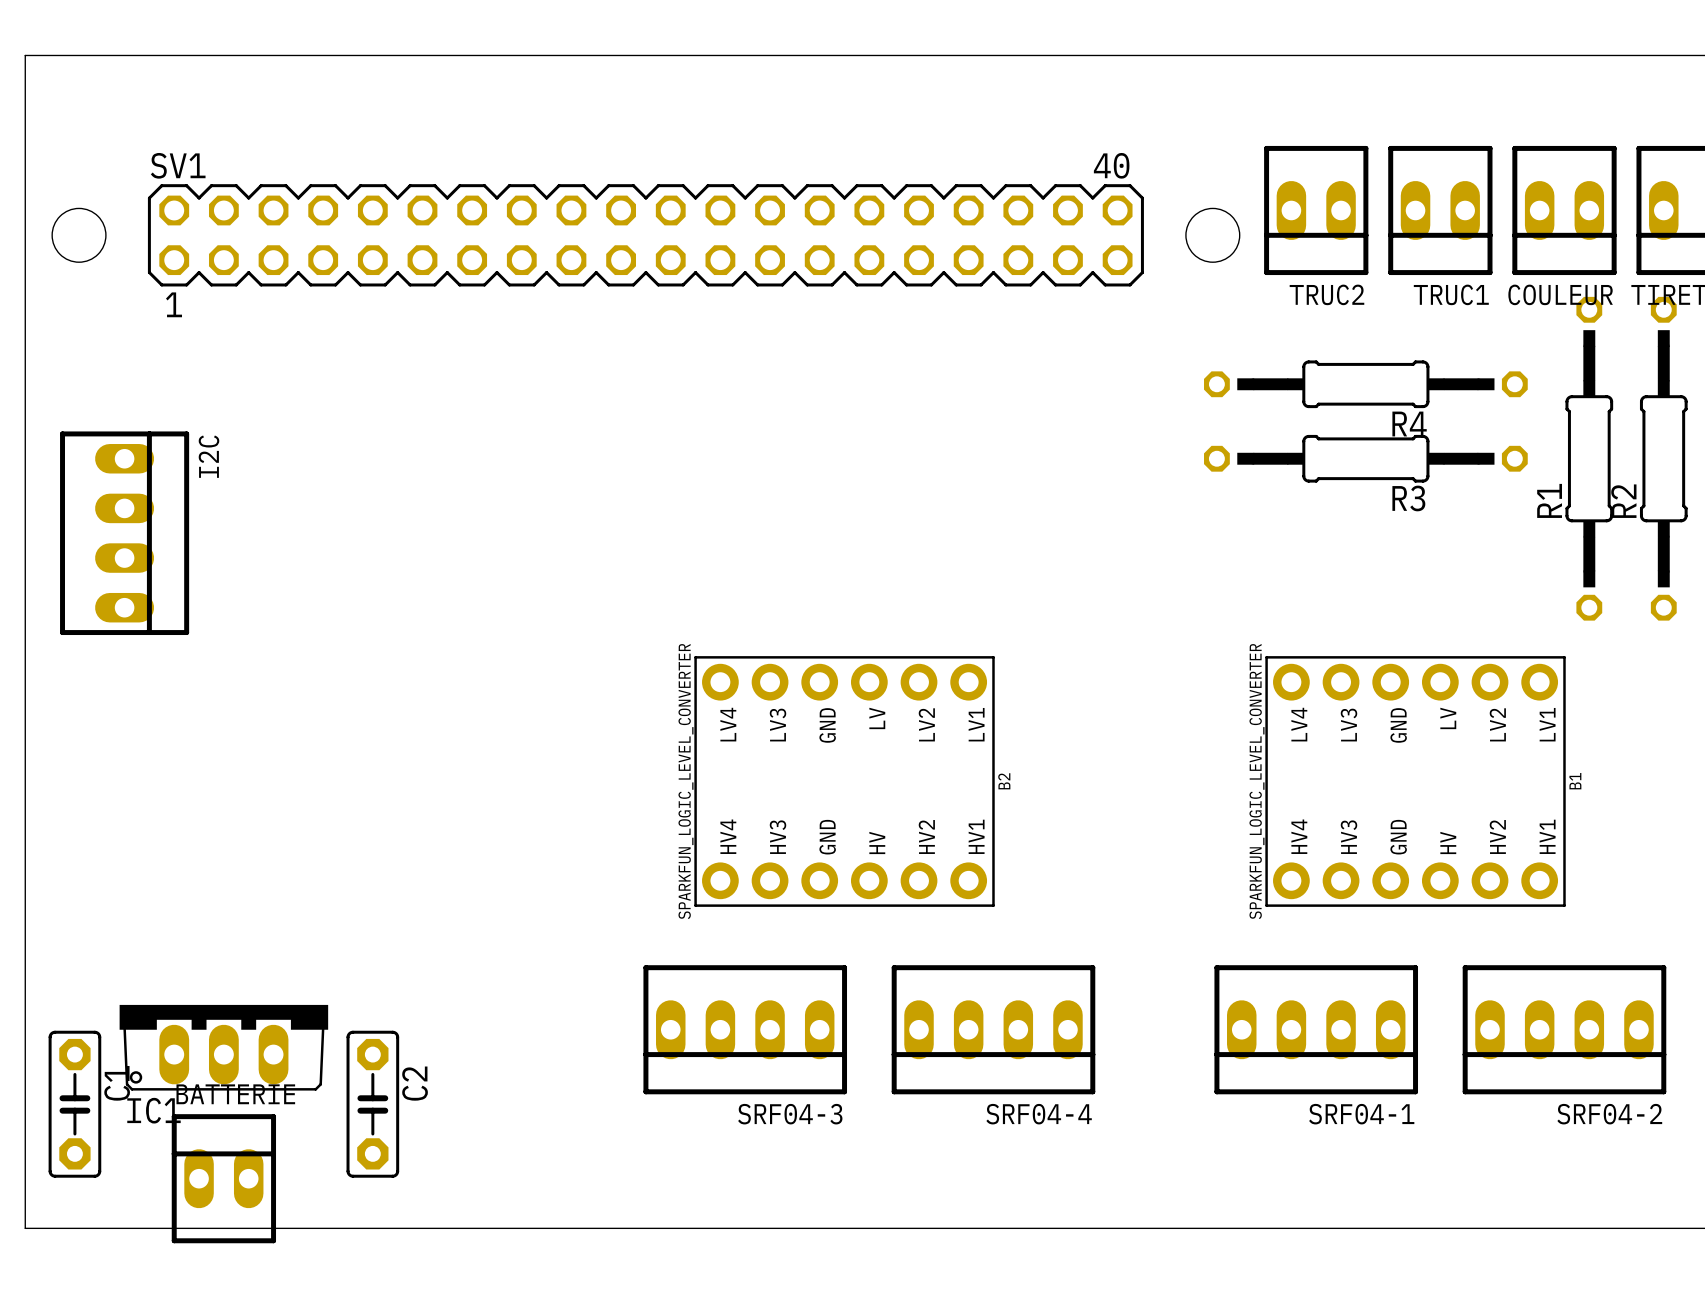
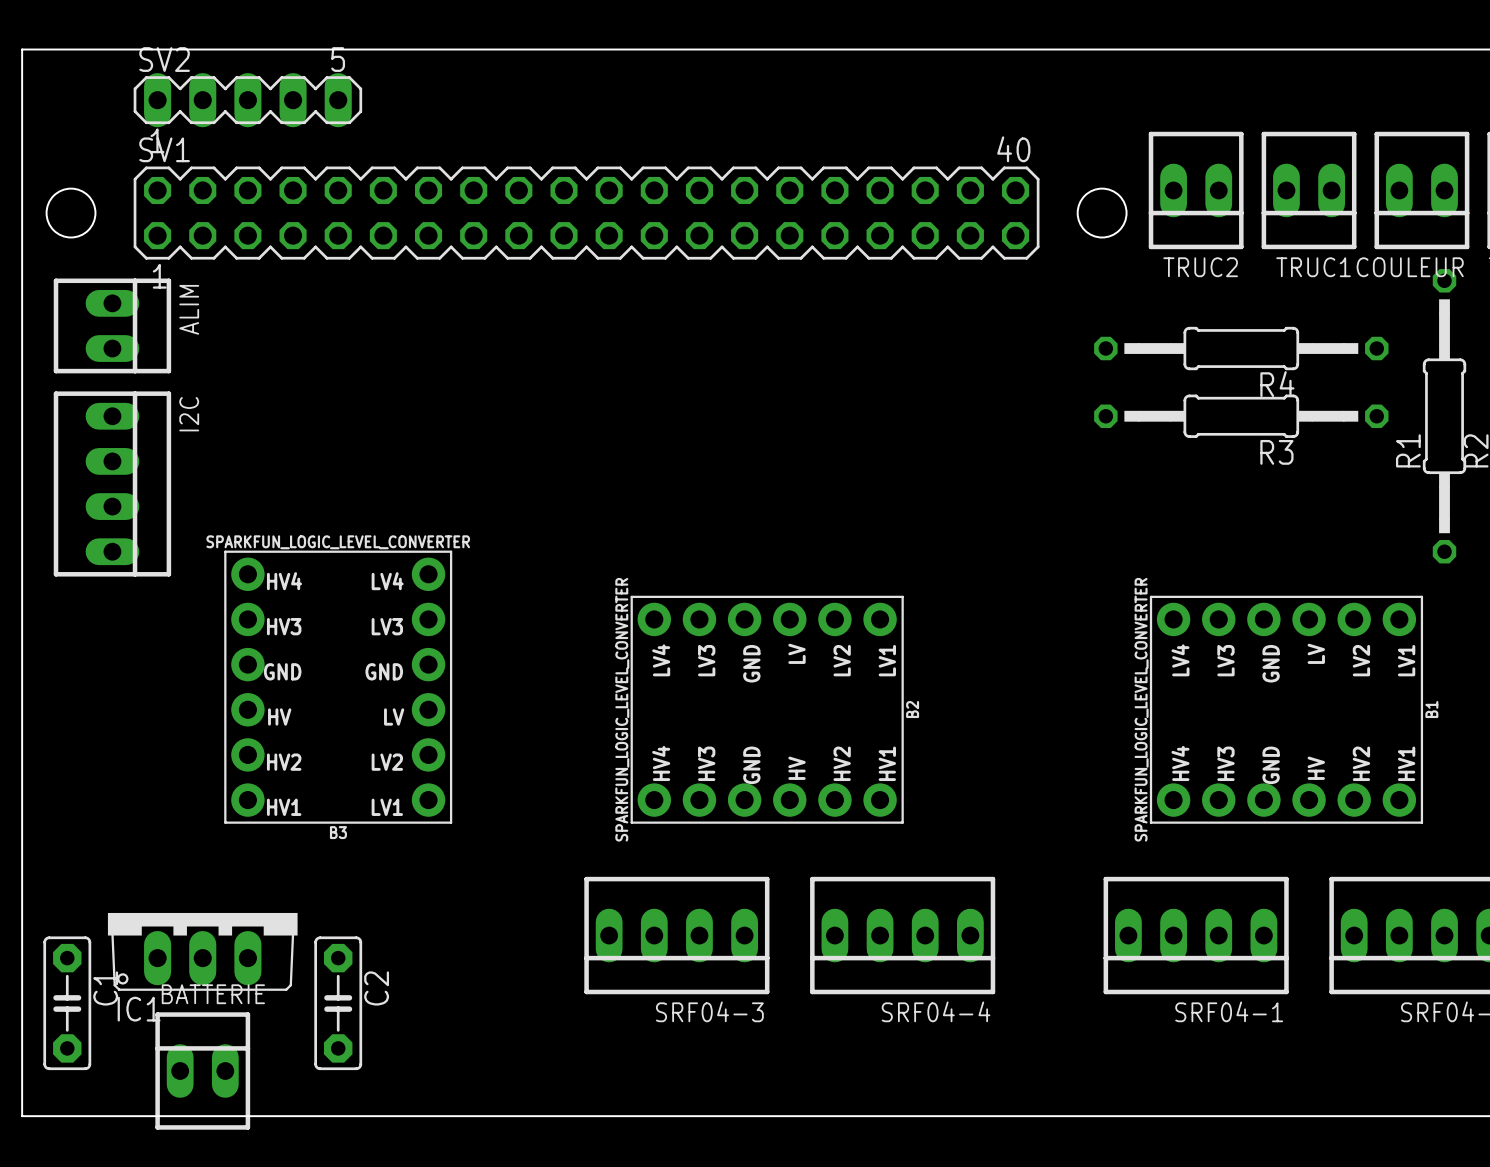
SV2: none -> (247, 100)
ALIM: none -> (112, 325)
B3: none -> SPARKFUN_LOGIC_LEVEL_CONVERTER (338, 687)

